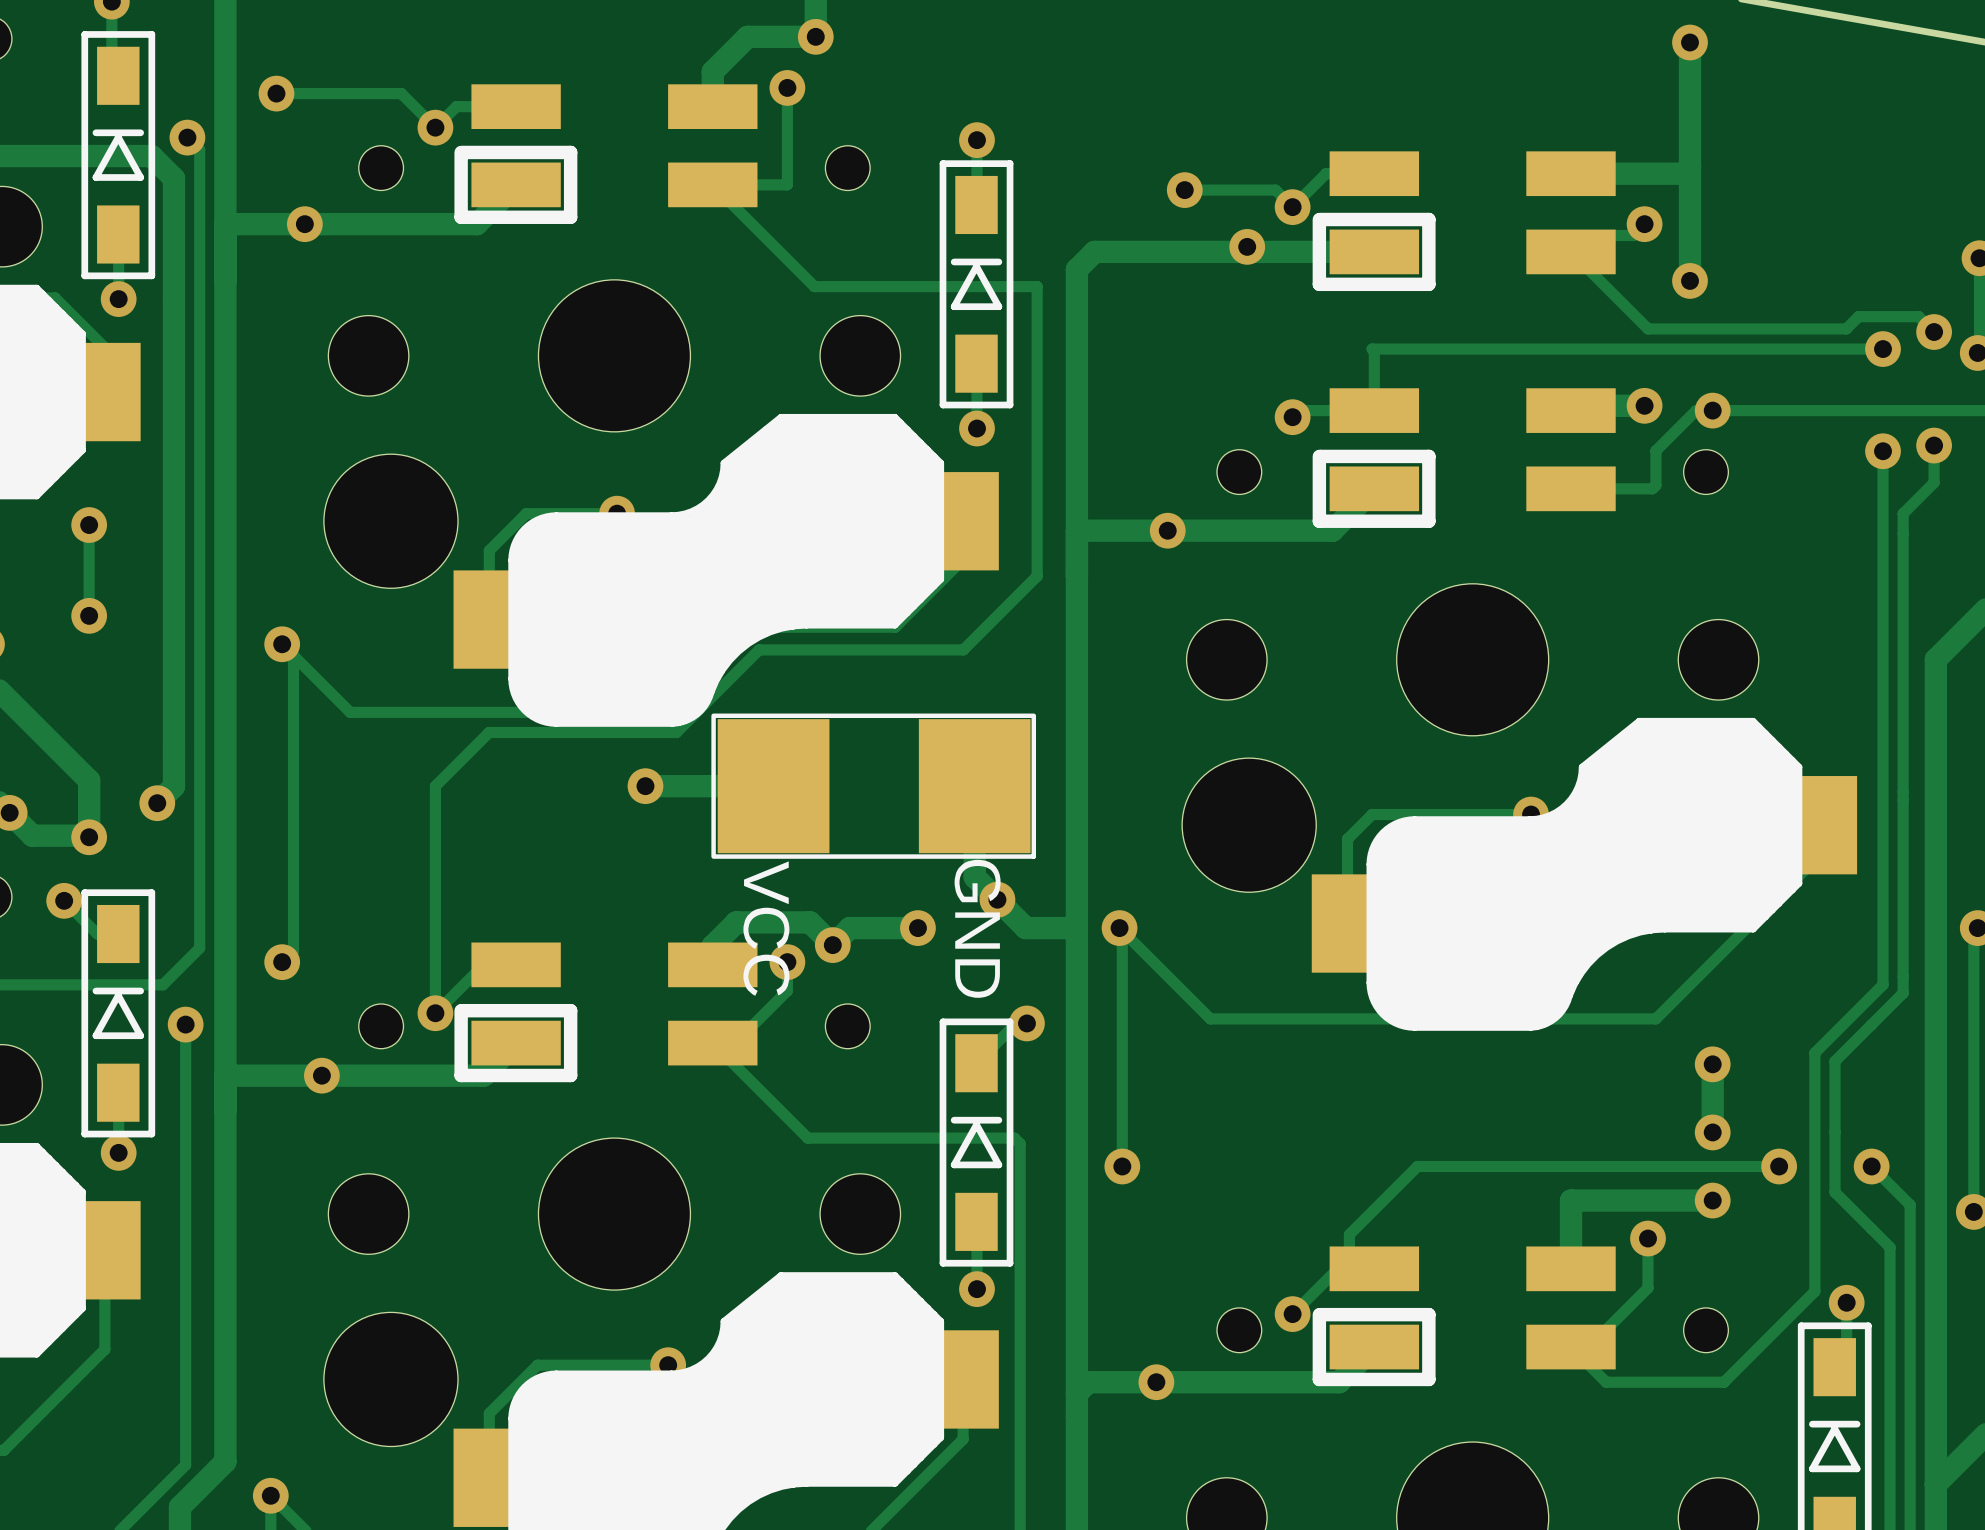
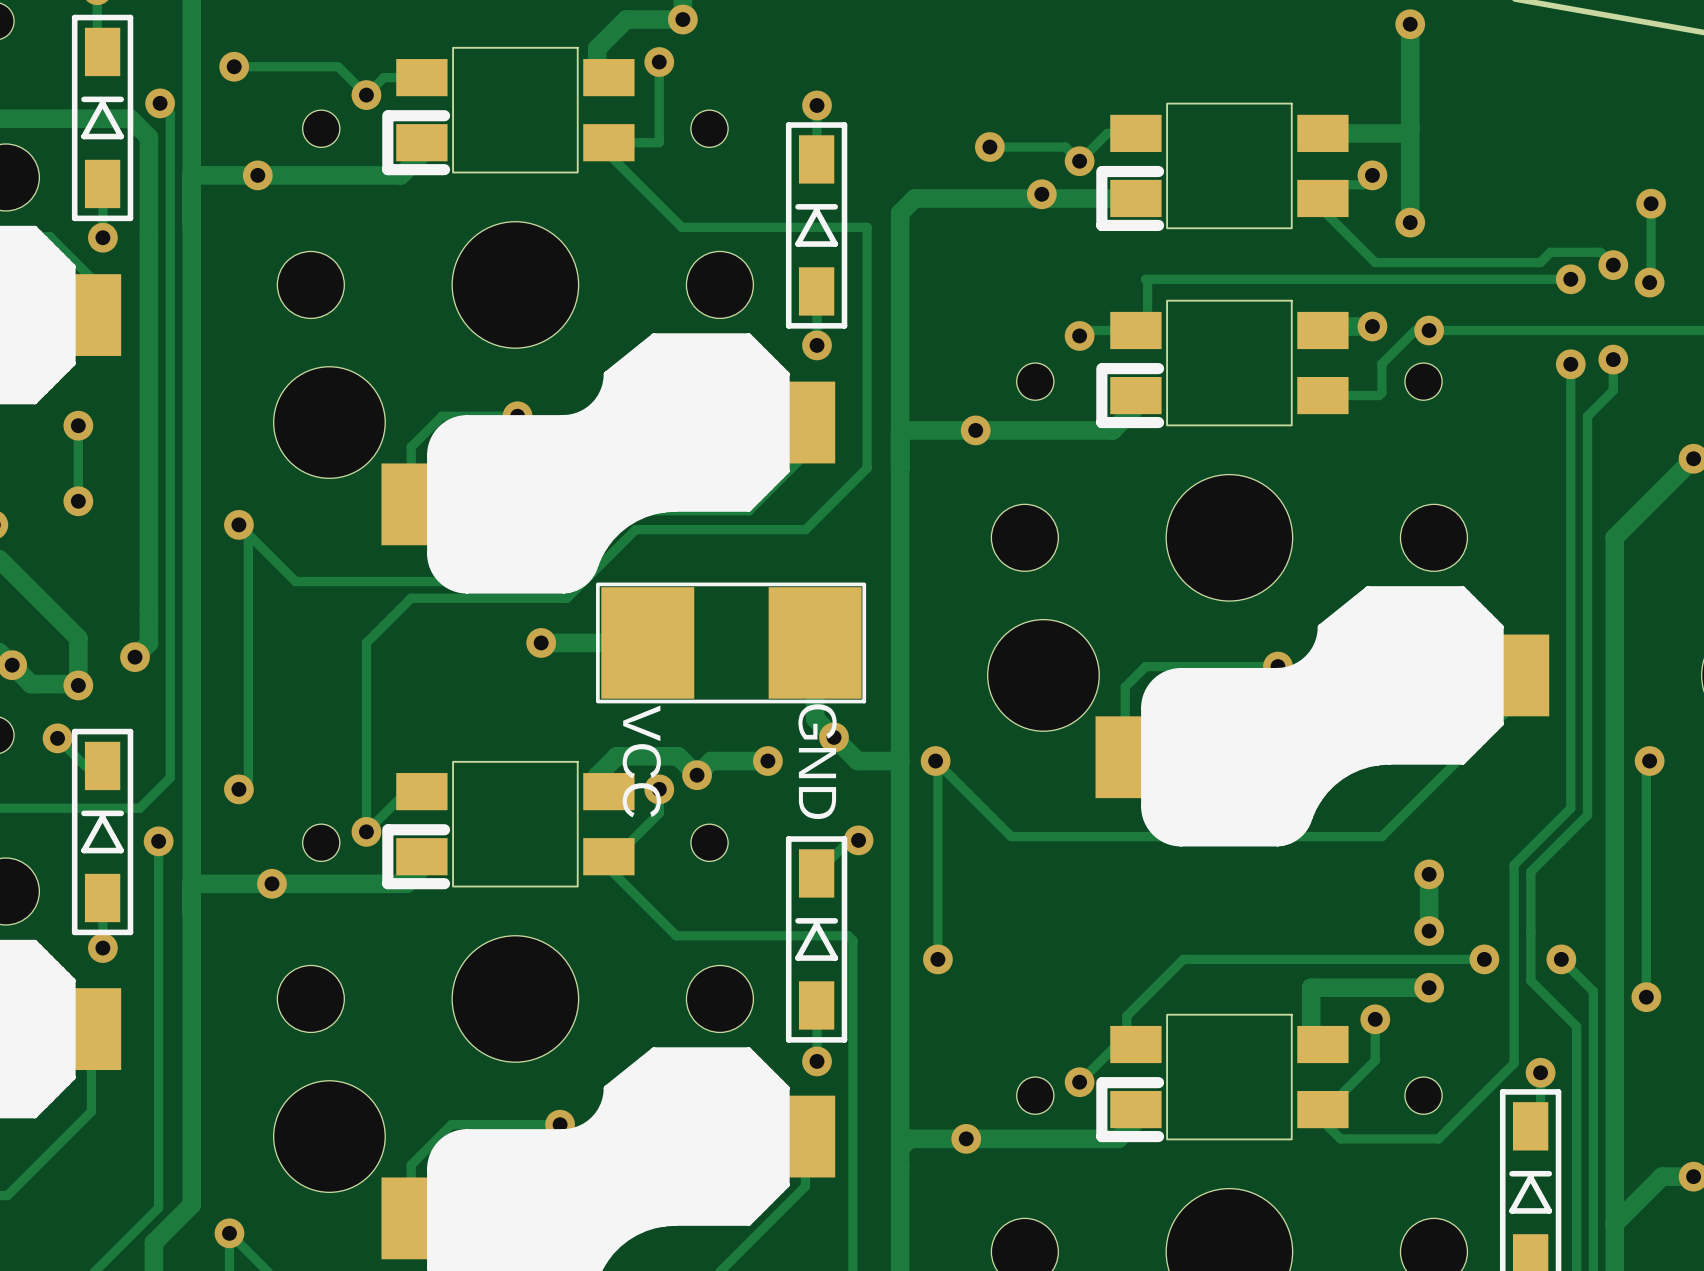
part footprint: [454, 84, 758, 224] -> [382, 46, 635, 176]
part footprint: [1312, 151, 1616, 292] -> [1096, 102, 1349, 232]
part footprint: [1312, 388, 1616, 528] -> [1096, 299, 1349, 429]
part footprint: [454, 942, 758, 1083] -> [382, 760, 635, 890]
part footprint: [1312, 1246, 1616, 1387] -> [1096, 1013, 1349, 1143]

